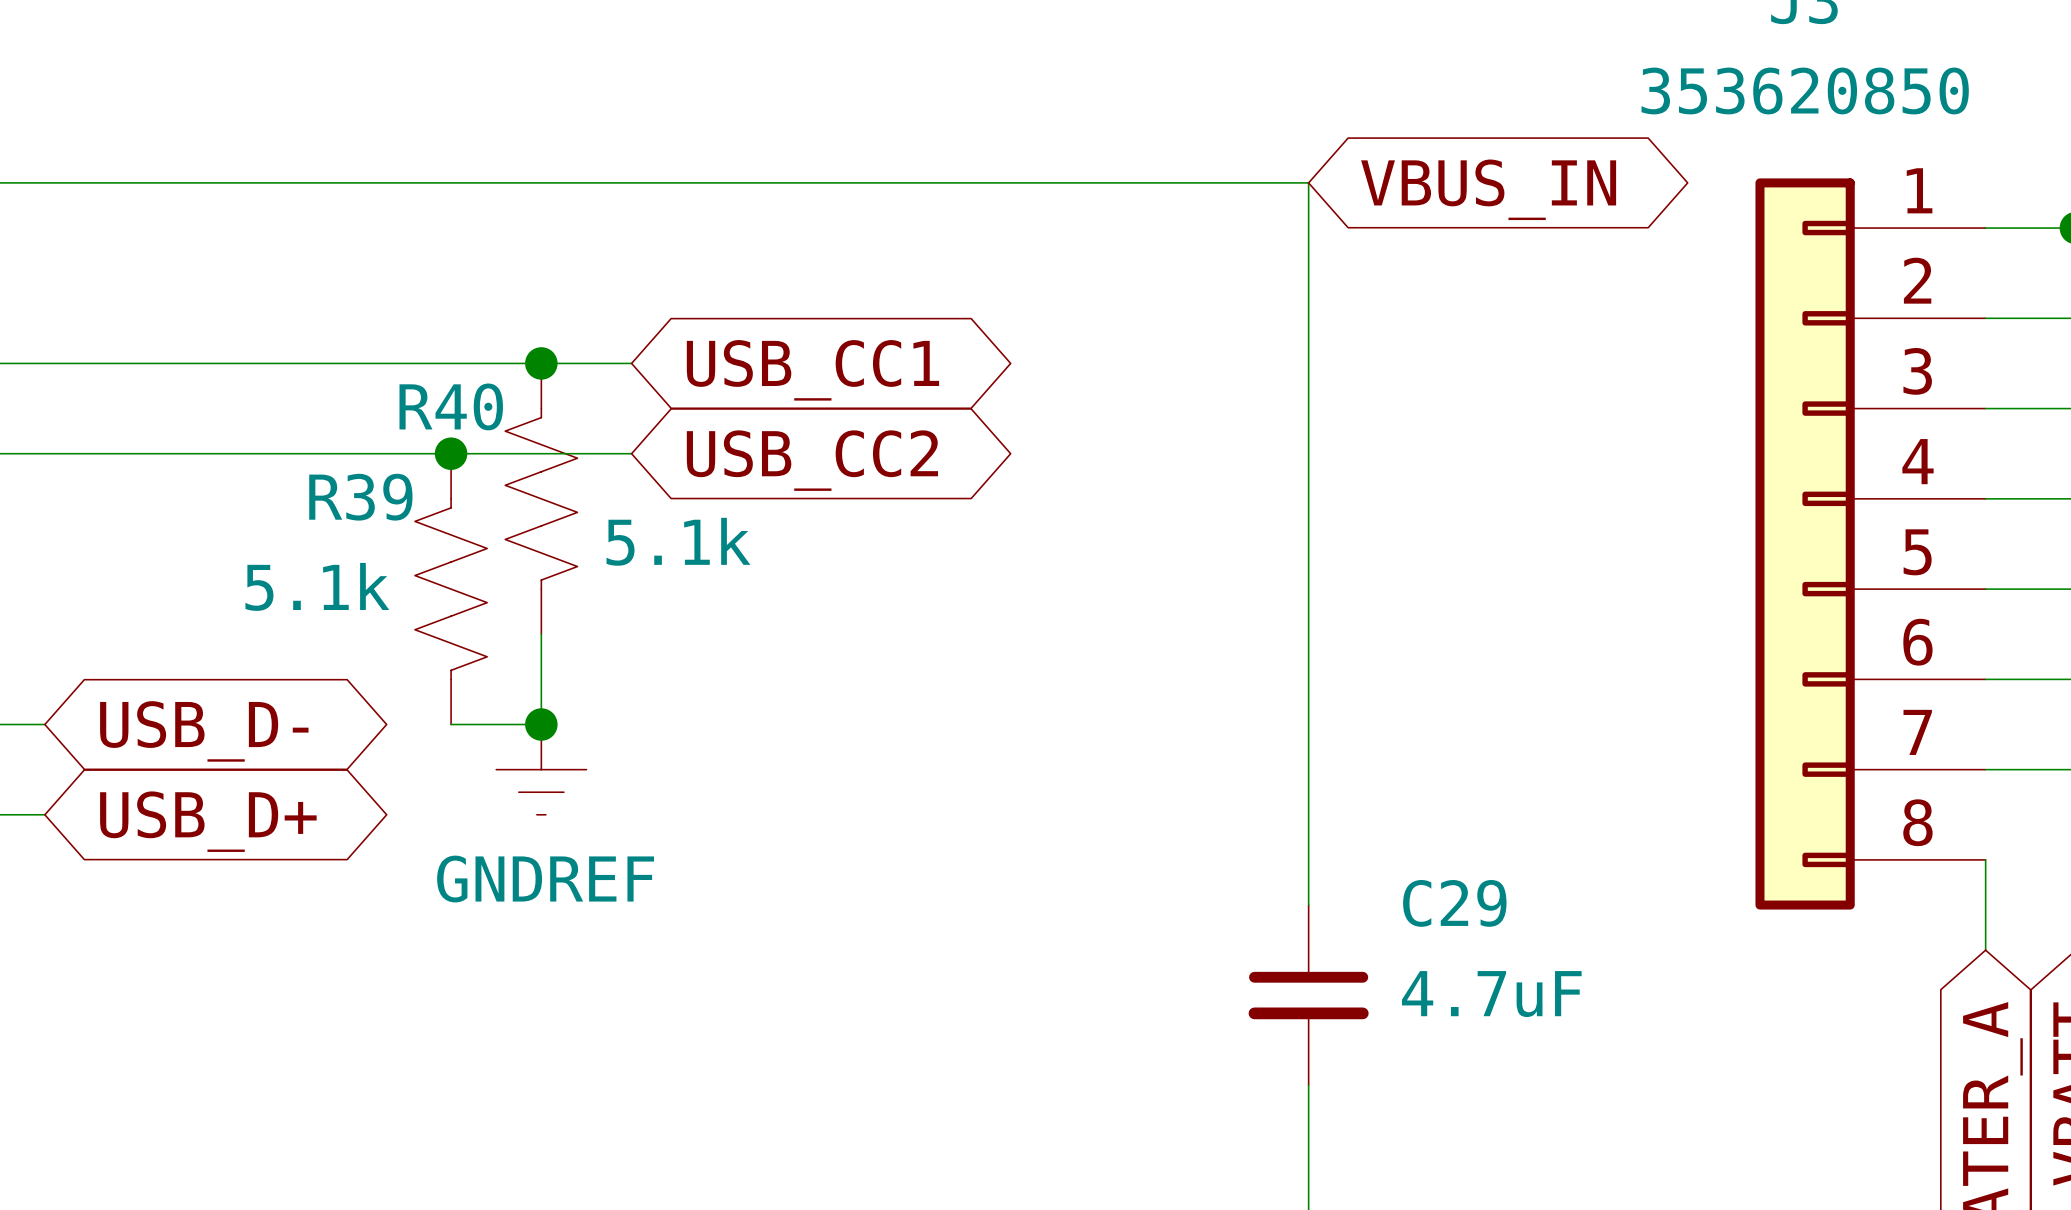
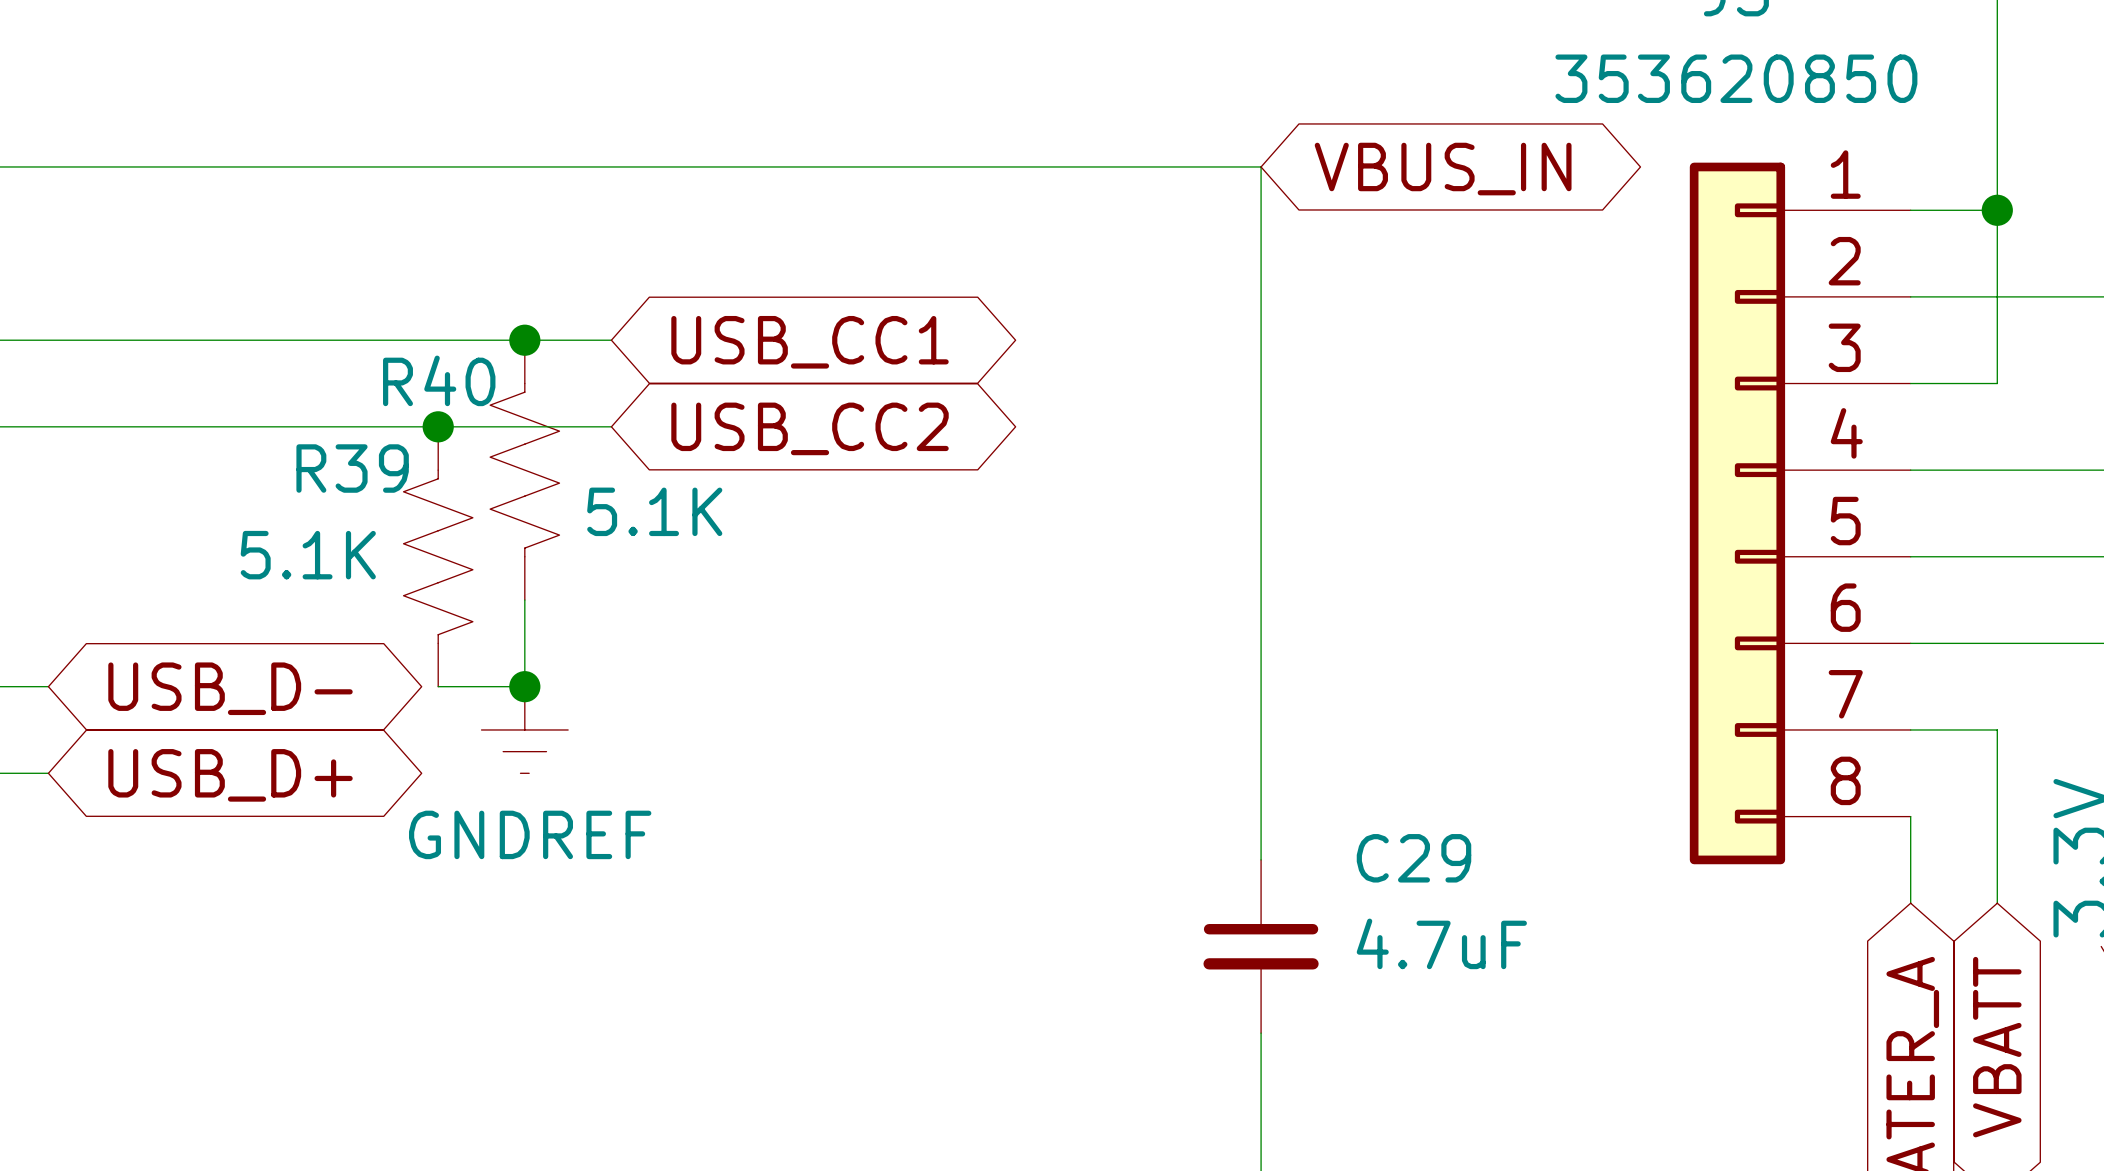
R40 value: 5.1k (678, 541) -> 5.1K (654, 511)
R39 value: 5.1k (317, 586) -> 5.1K (308, 555)

